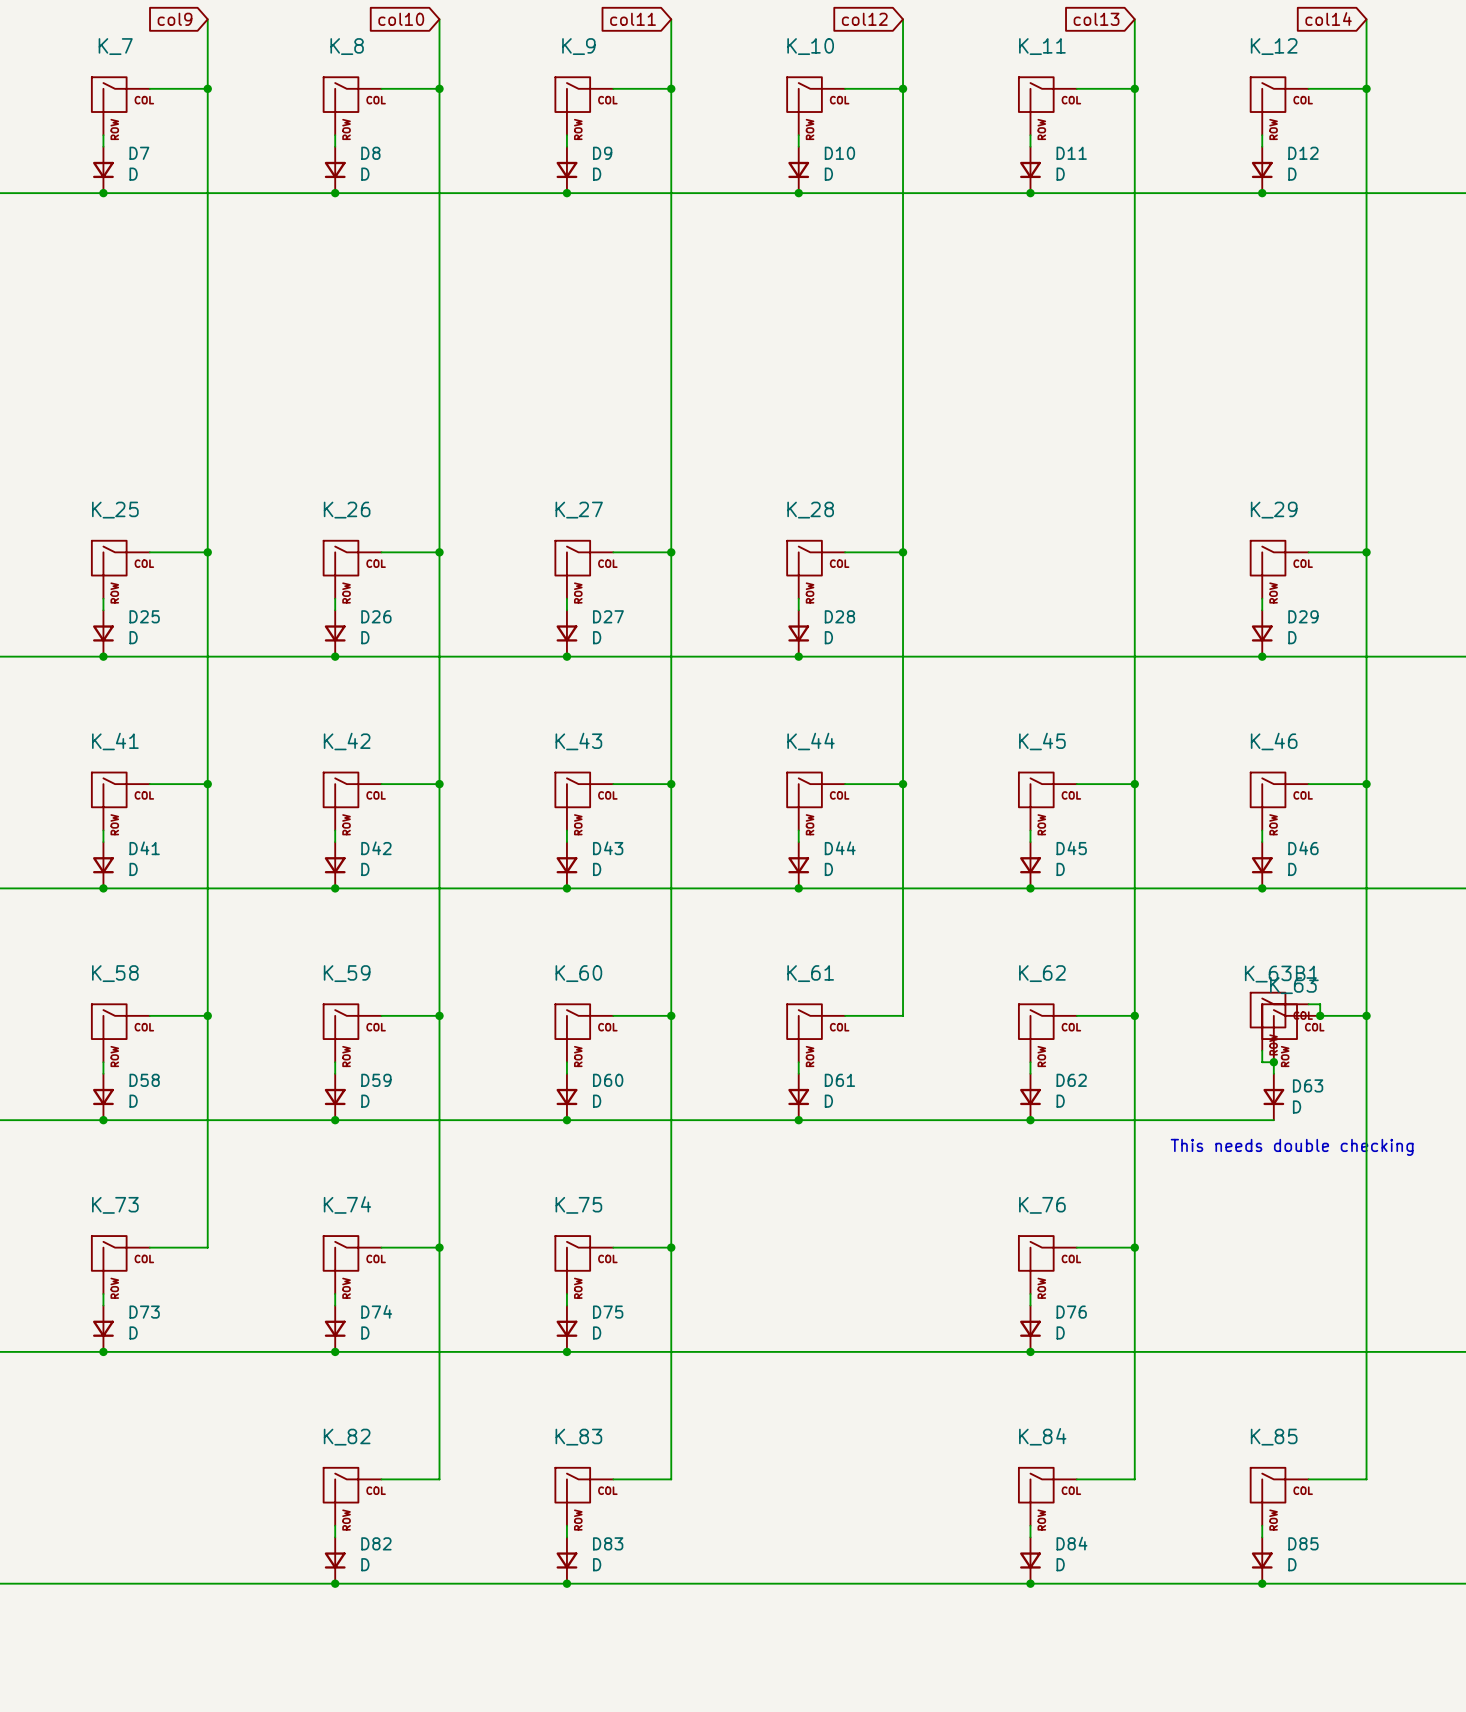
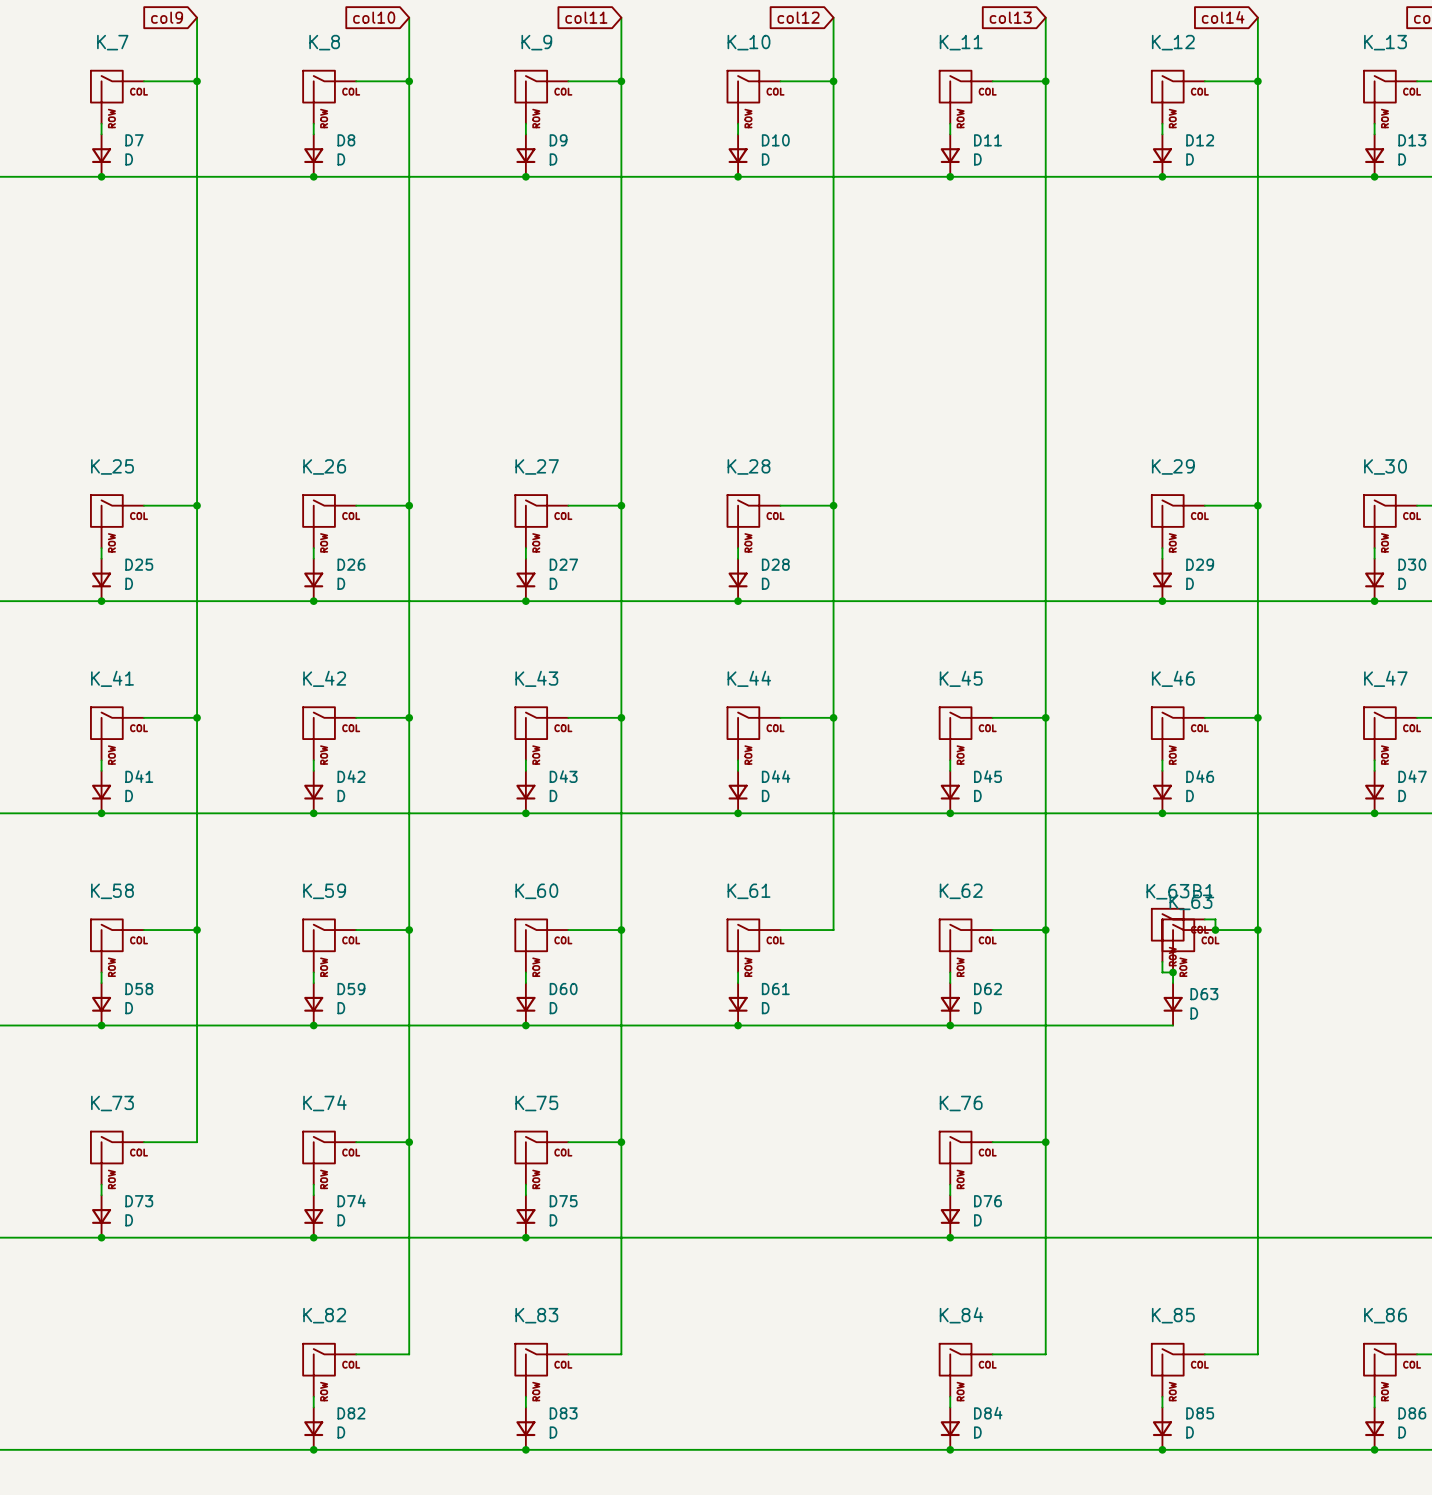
text: This needs double checking (1292, 1147) -> none

